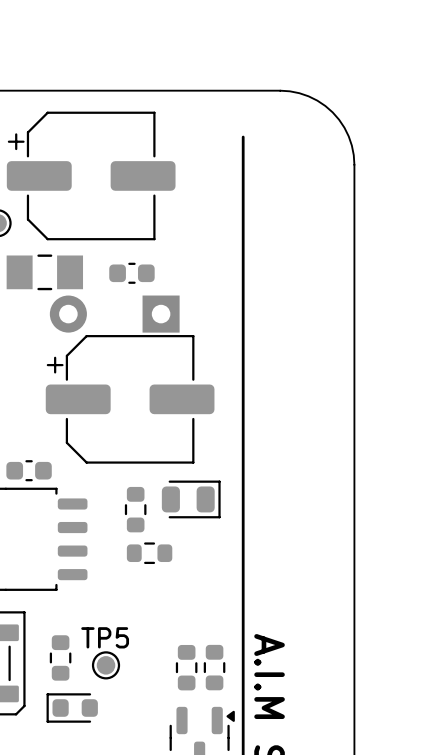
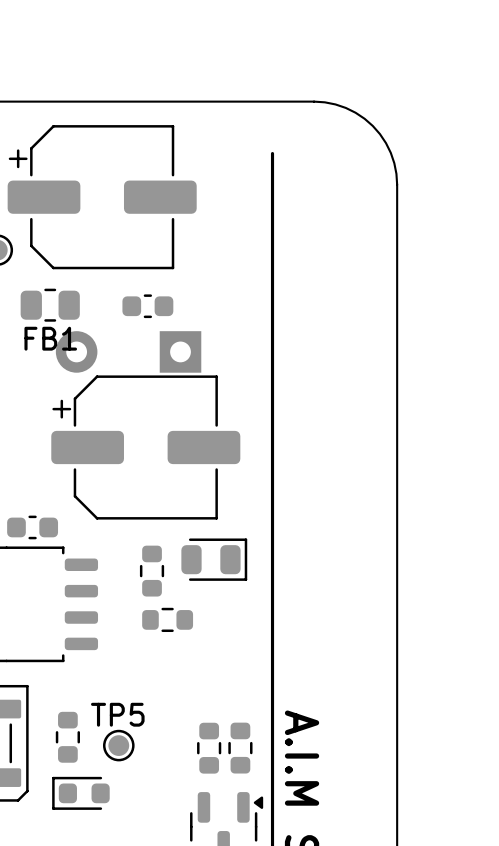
part: (44, 272) -> none
FB1: none -> (50, 305)

